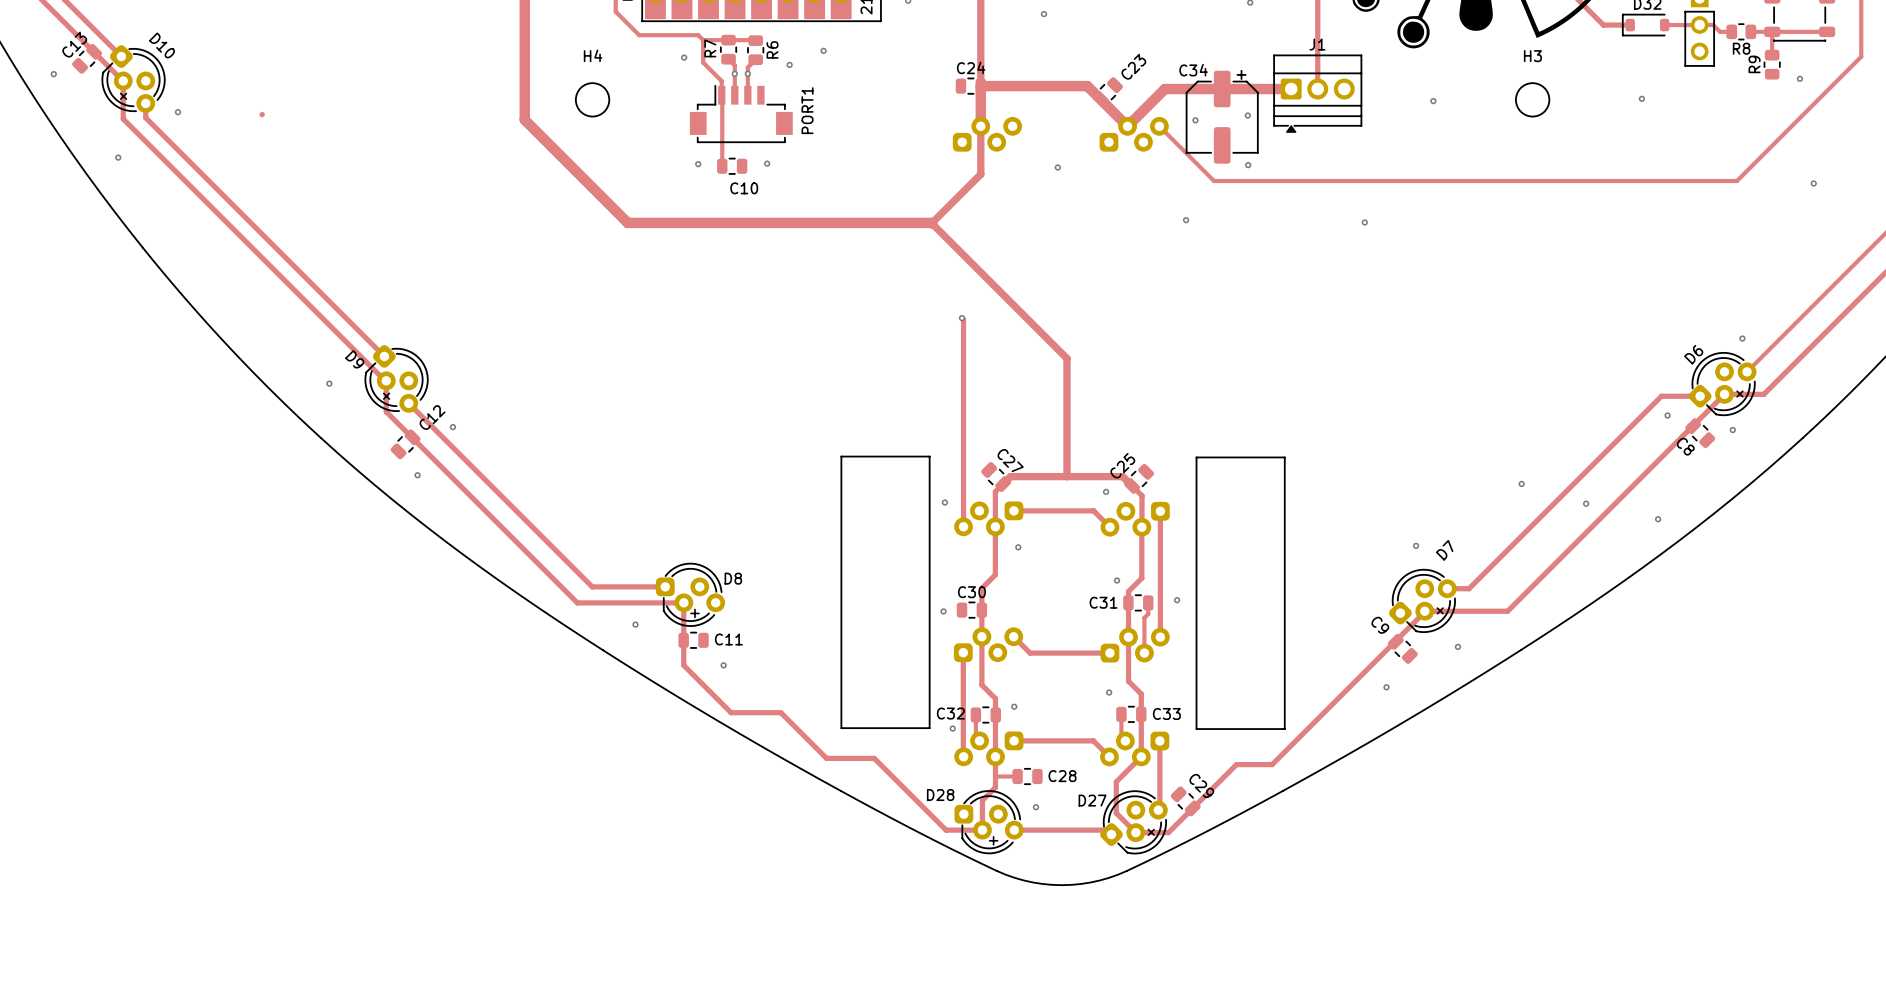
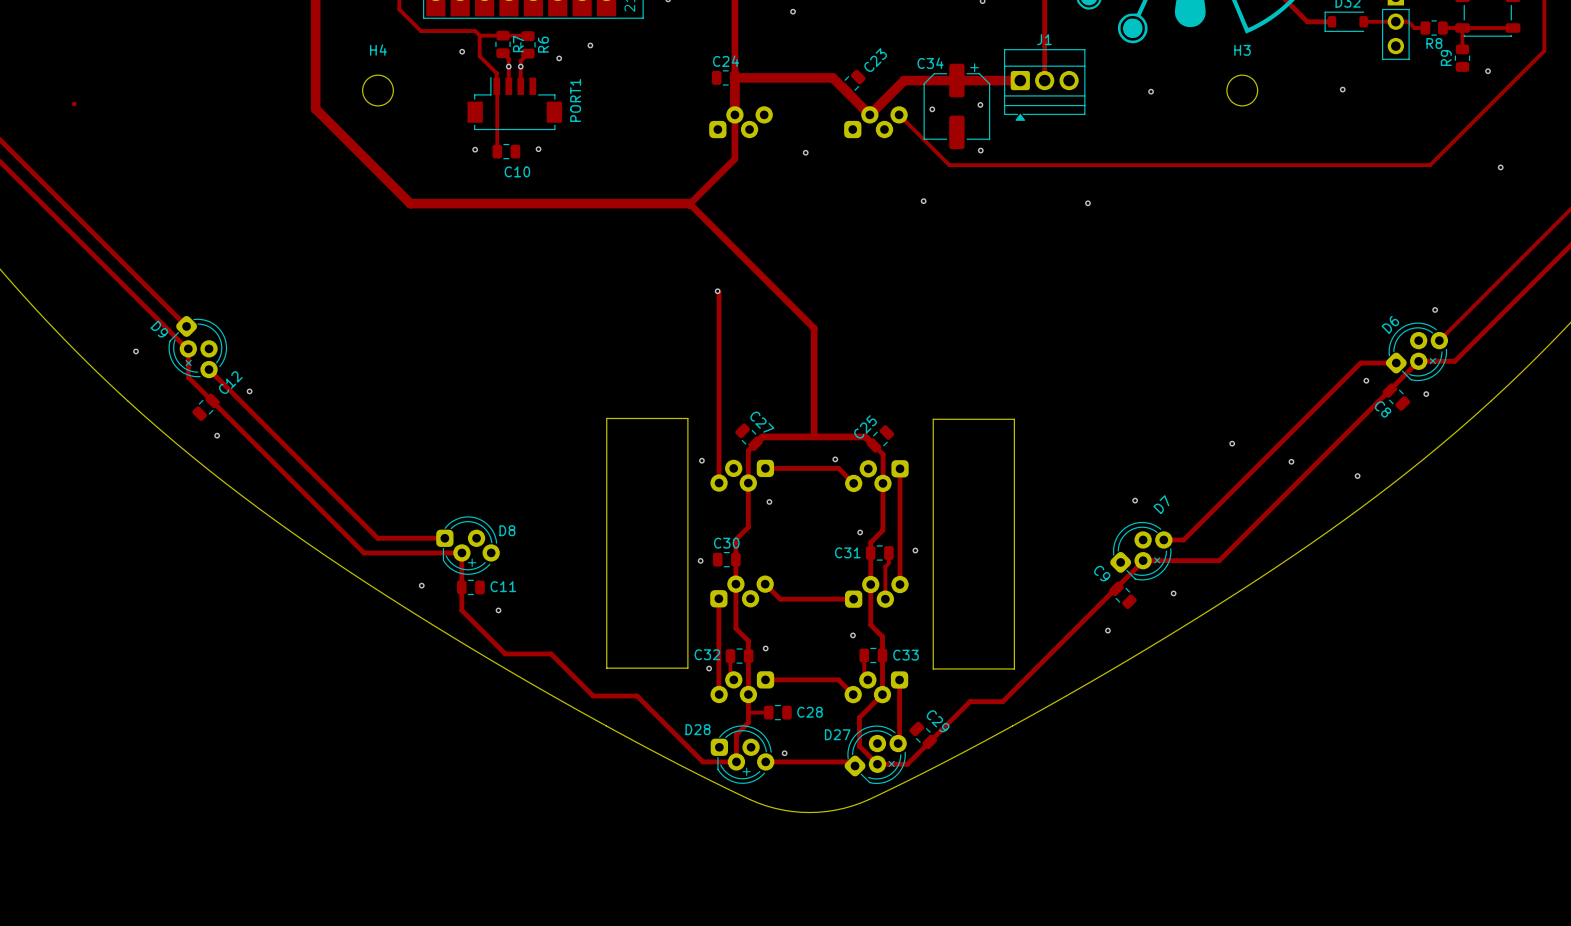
R7 name position: R7 (710, 48) -> R7 (518, 43)
via position: (1106, 491) -> (835, 459)
via position: (635, 624) -> (421, 585)
via position: (1035, 807) -> (784, 753)

